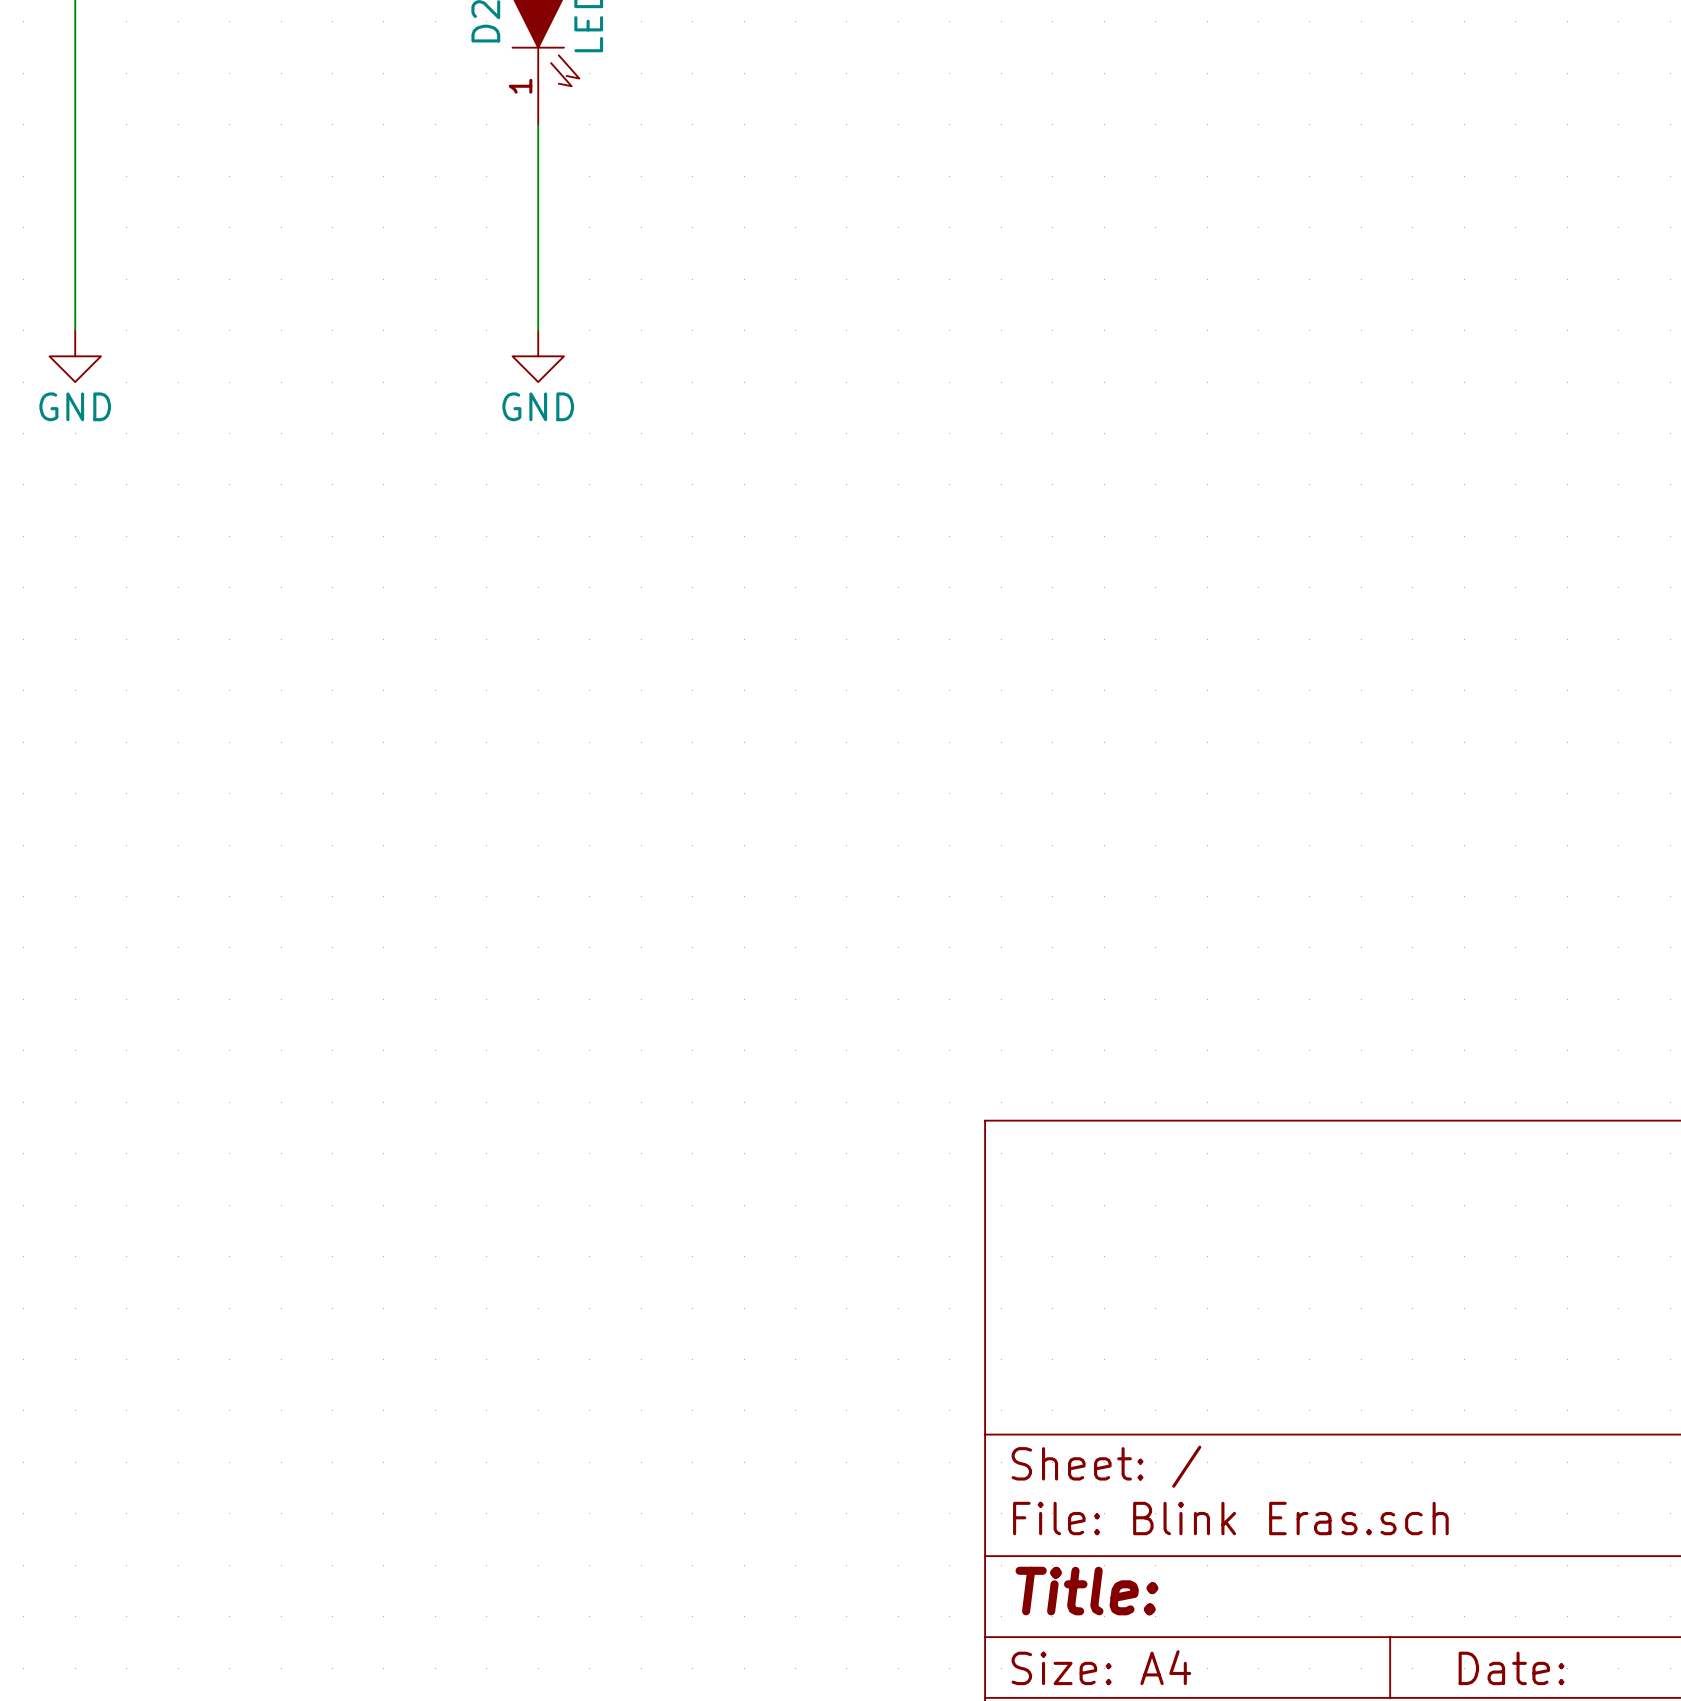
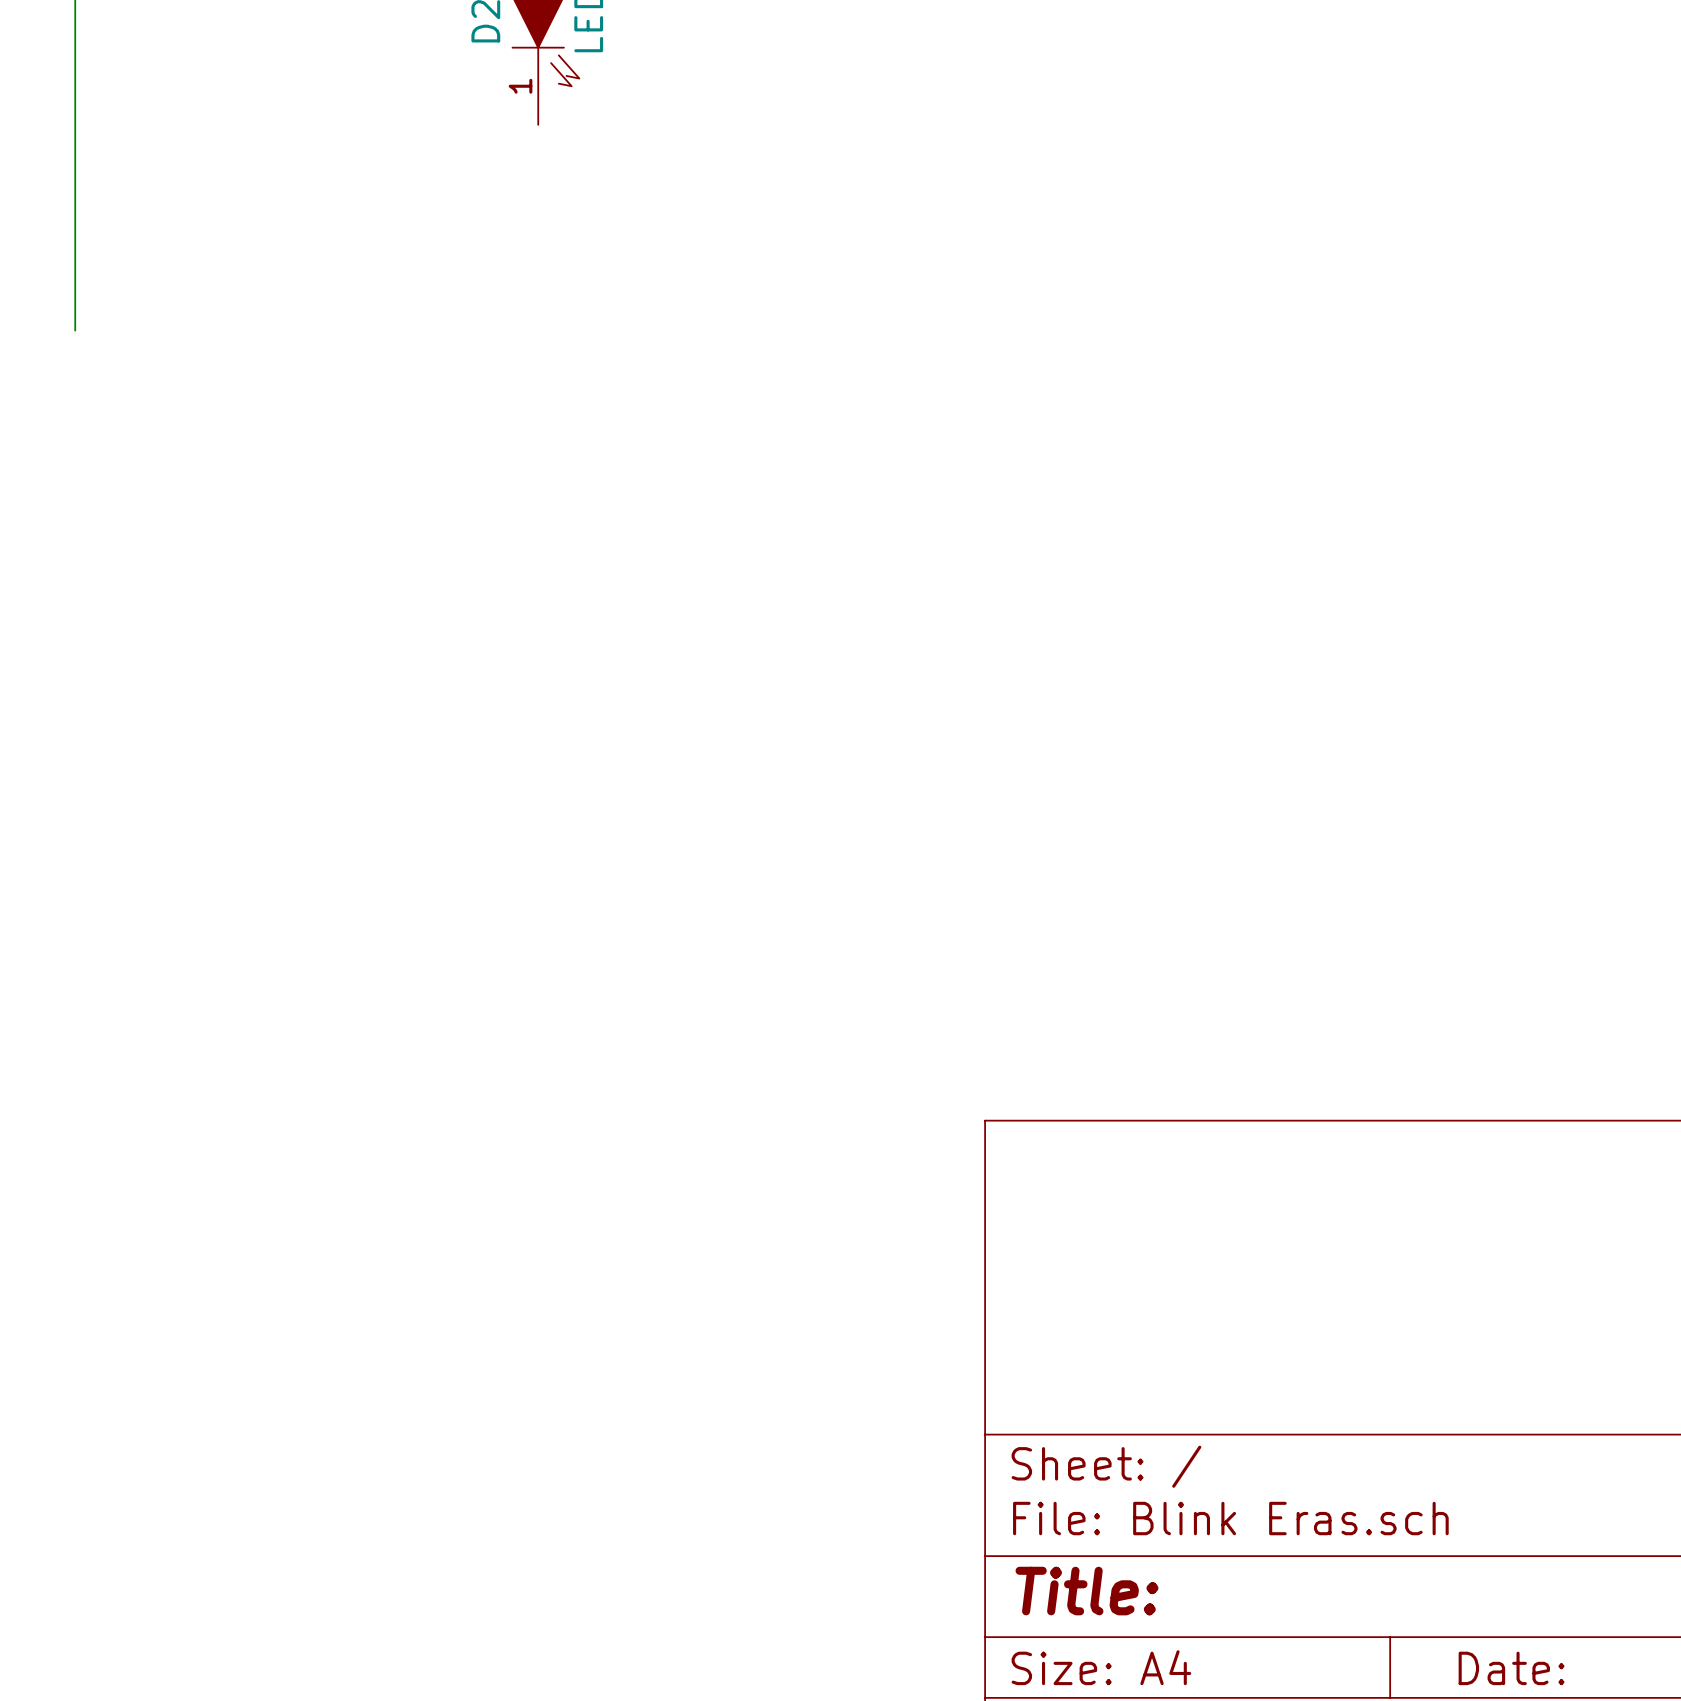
wire: (538, 124) (538, 330) -> none
power symbol: GND (75, 356) -> none
power symbol: GND (538, 356) -> none

